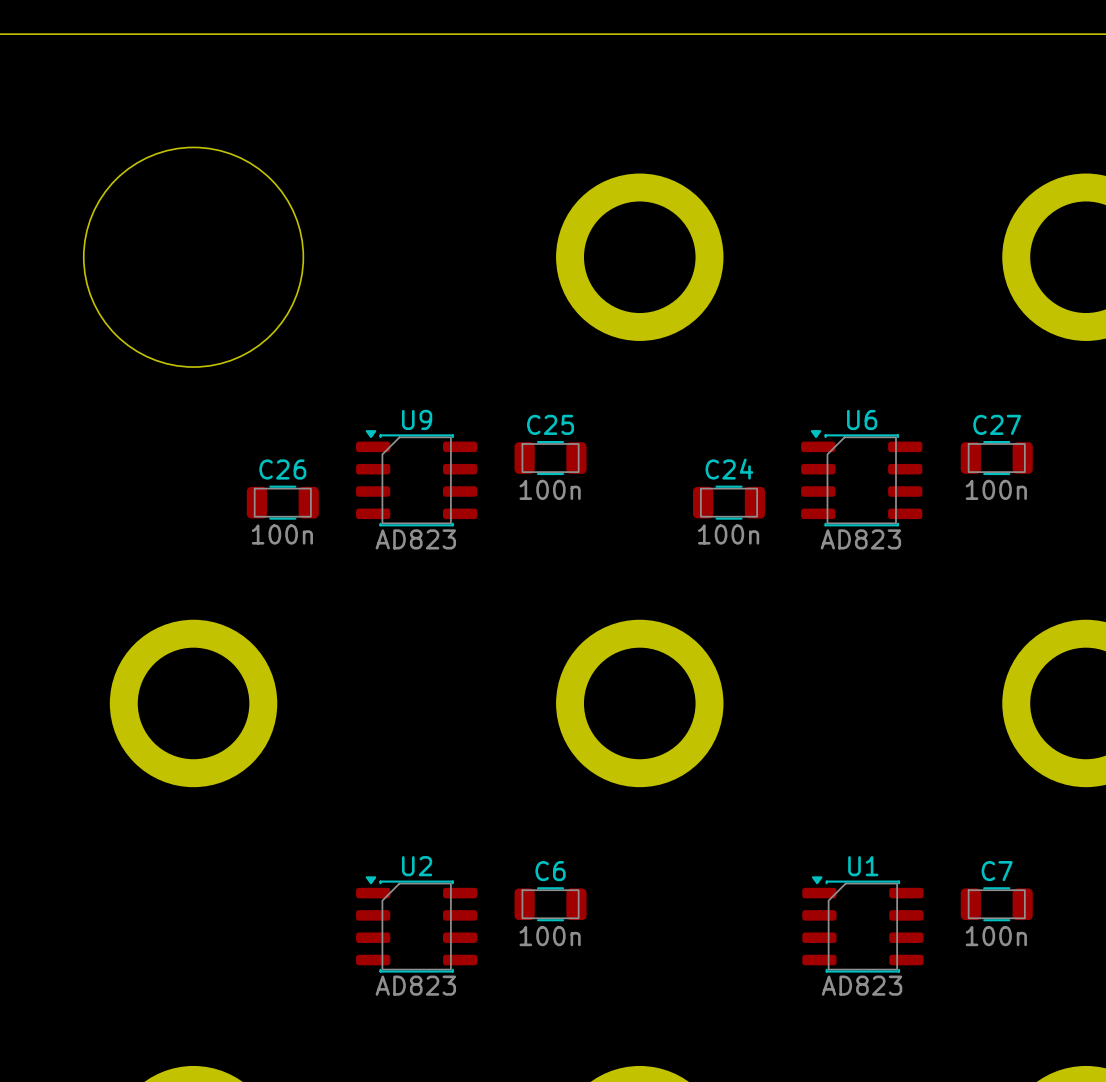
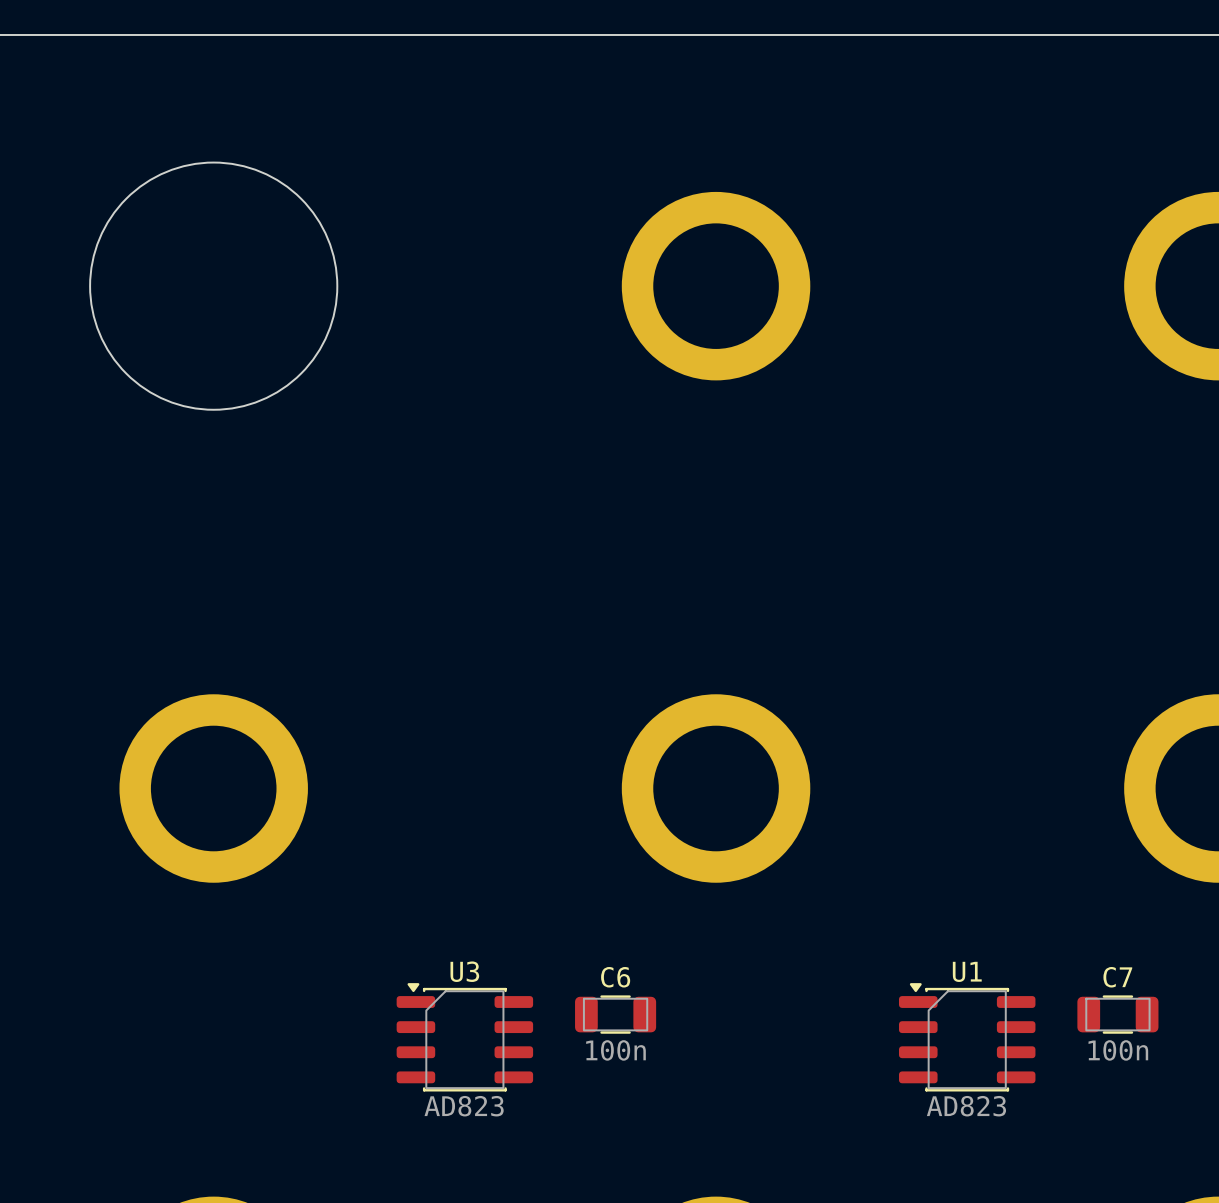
C25: 100n (550, 458) -> none
C27: 100n (996, 458) -> none
U9: AD823 (416, 478) -> none
U6: AD823 (861, 478) -> none
C26: 100n (282, 502) -> none
C24: 100n (729, 502) -> none
U2 name: U2 (417, 866) -> U3 (464, 971)

